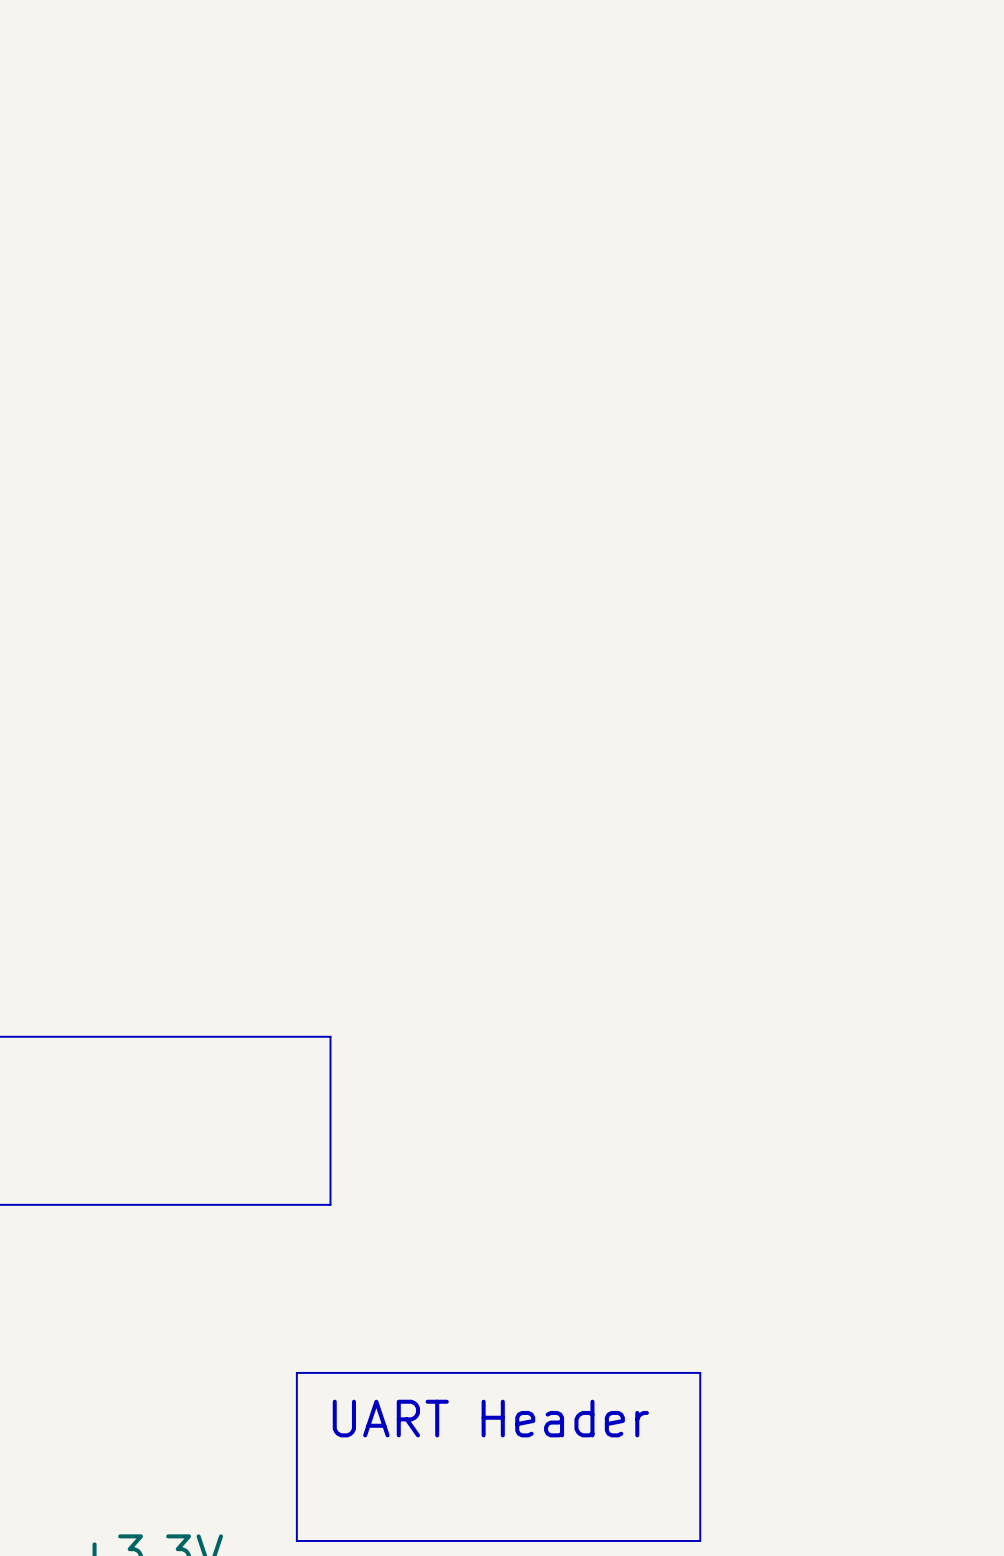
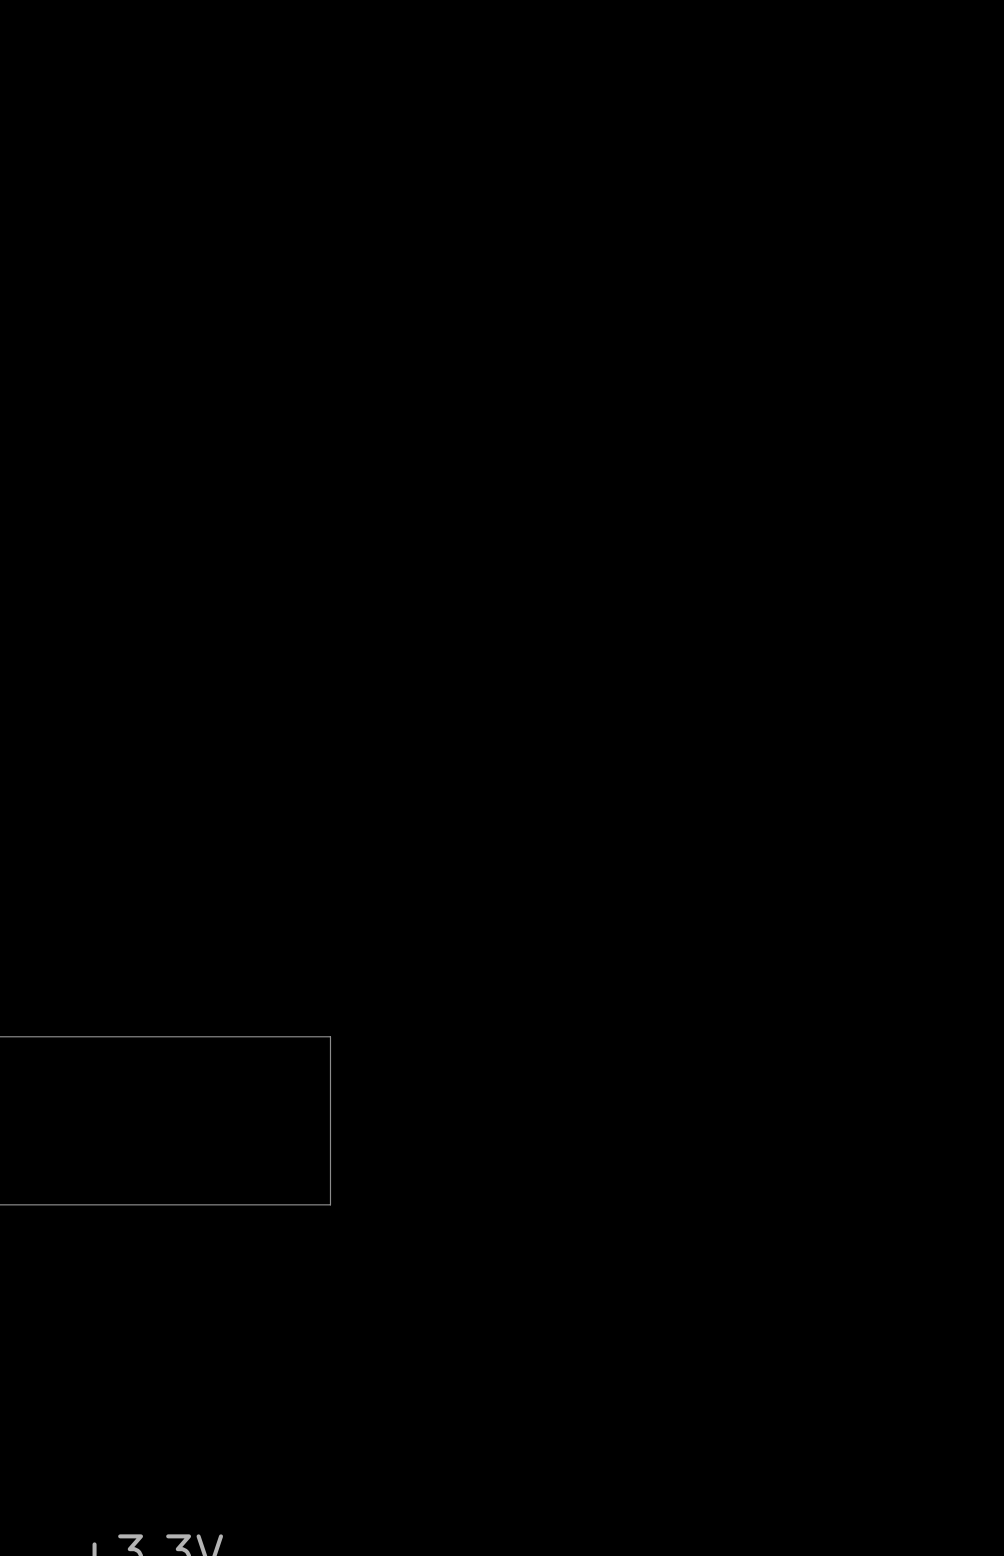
line: (296, 1372) (700, 1372) (700, 1540) (296, 1540) (296, 1372) -> none
text: UART Header (490, 1418) -> none

